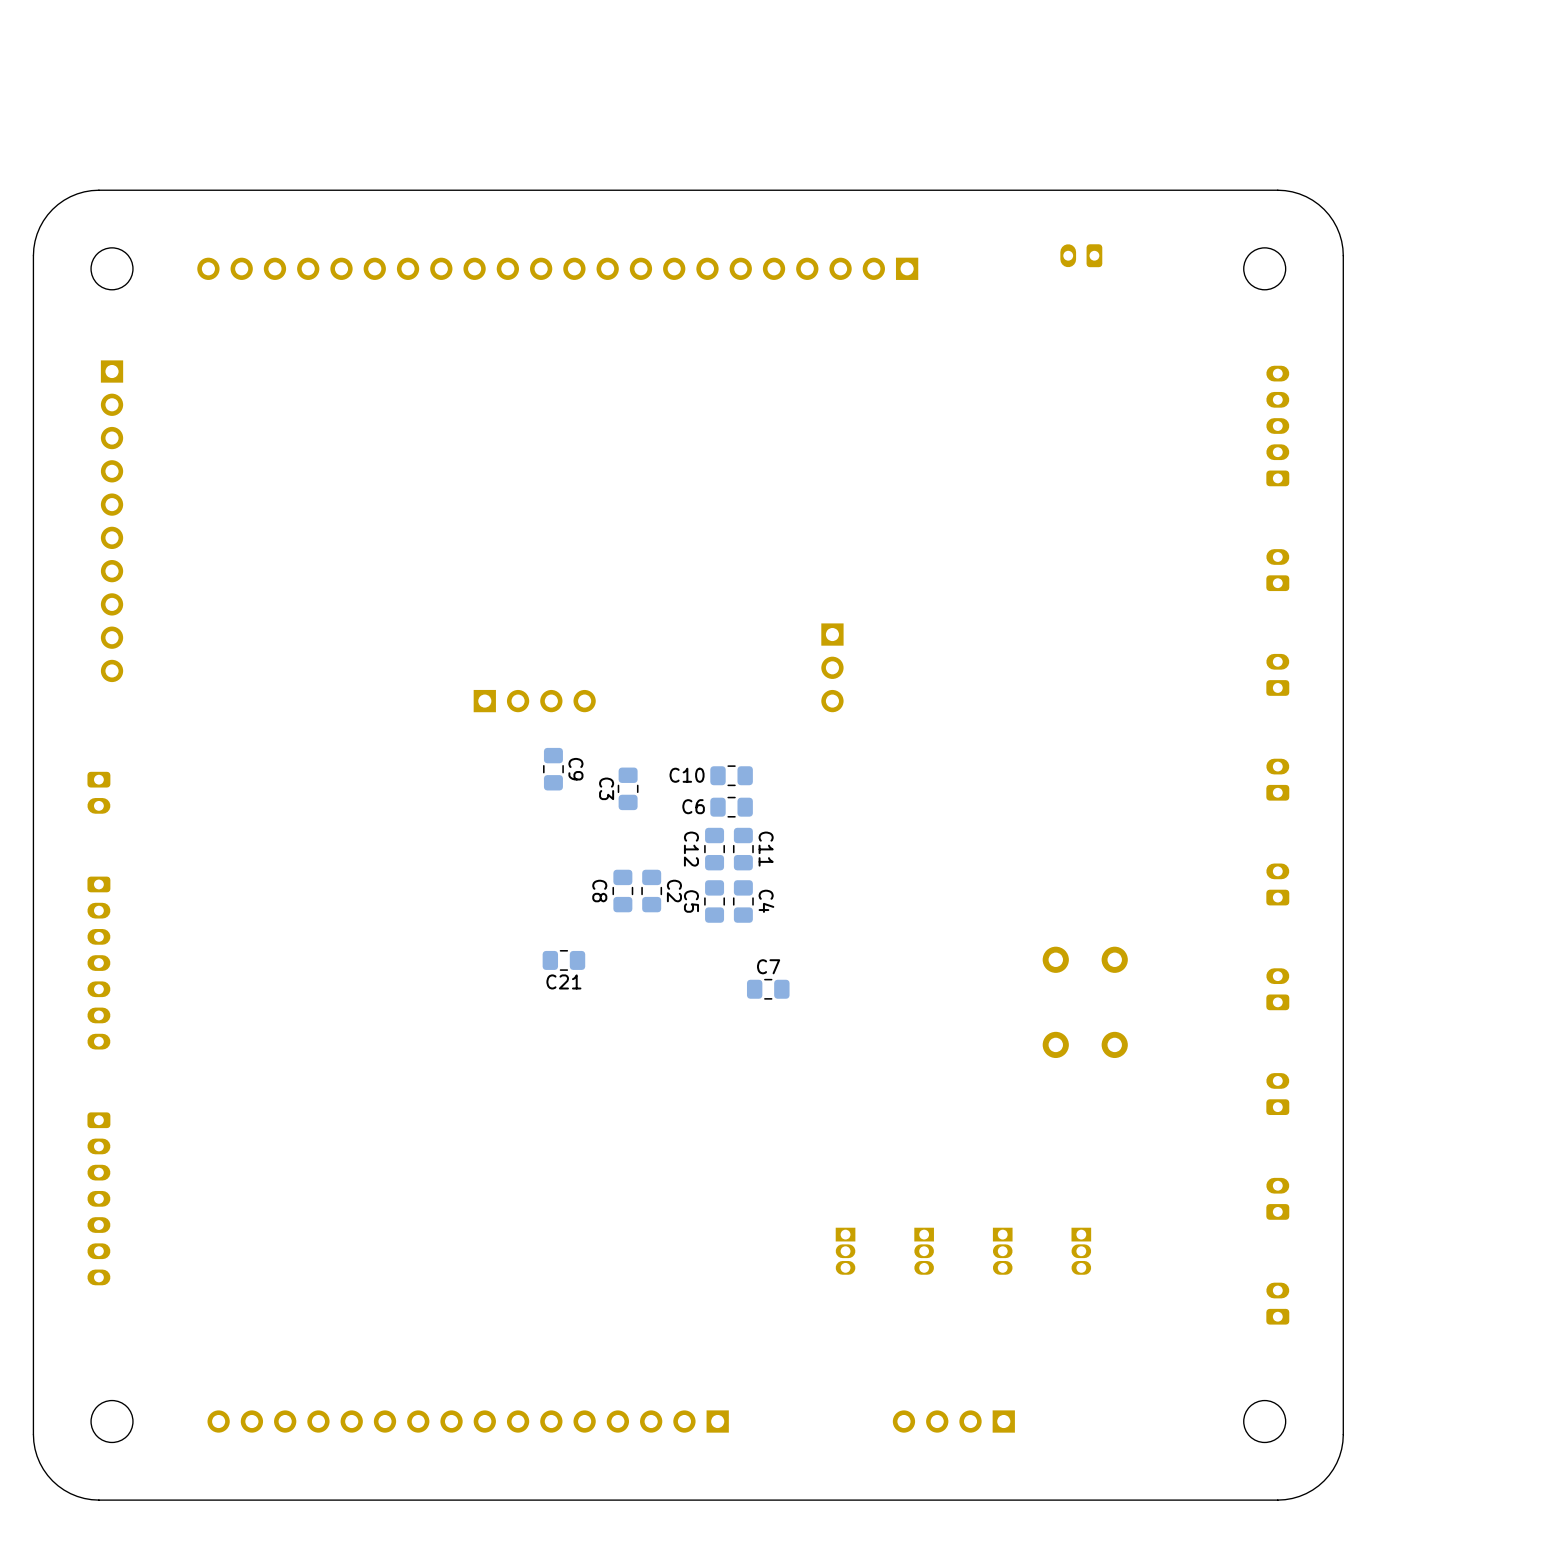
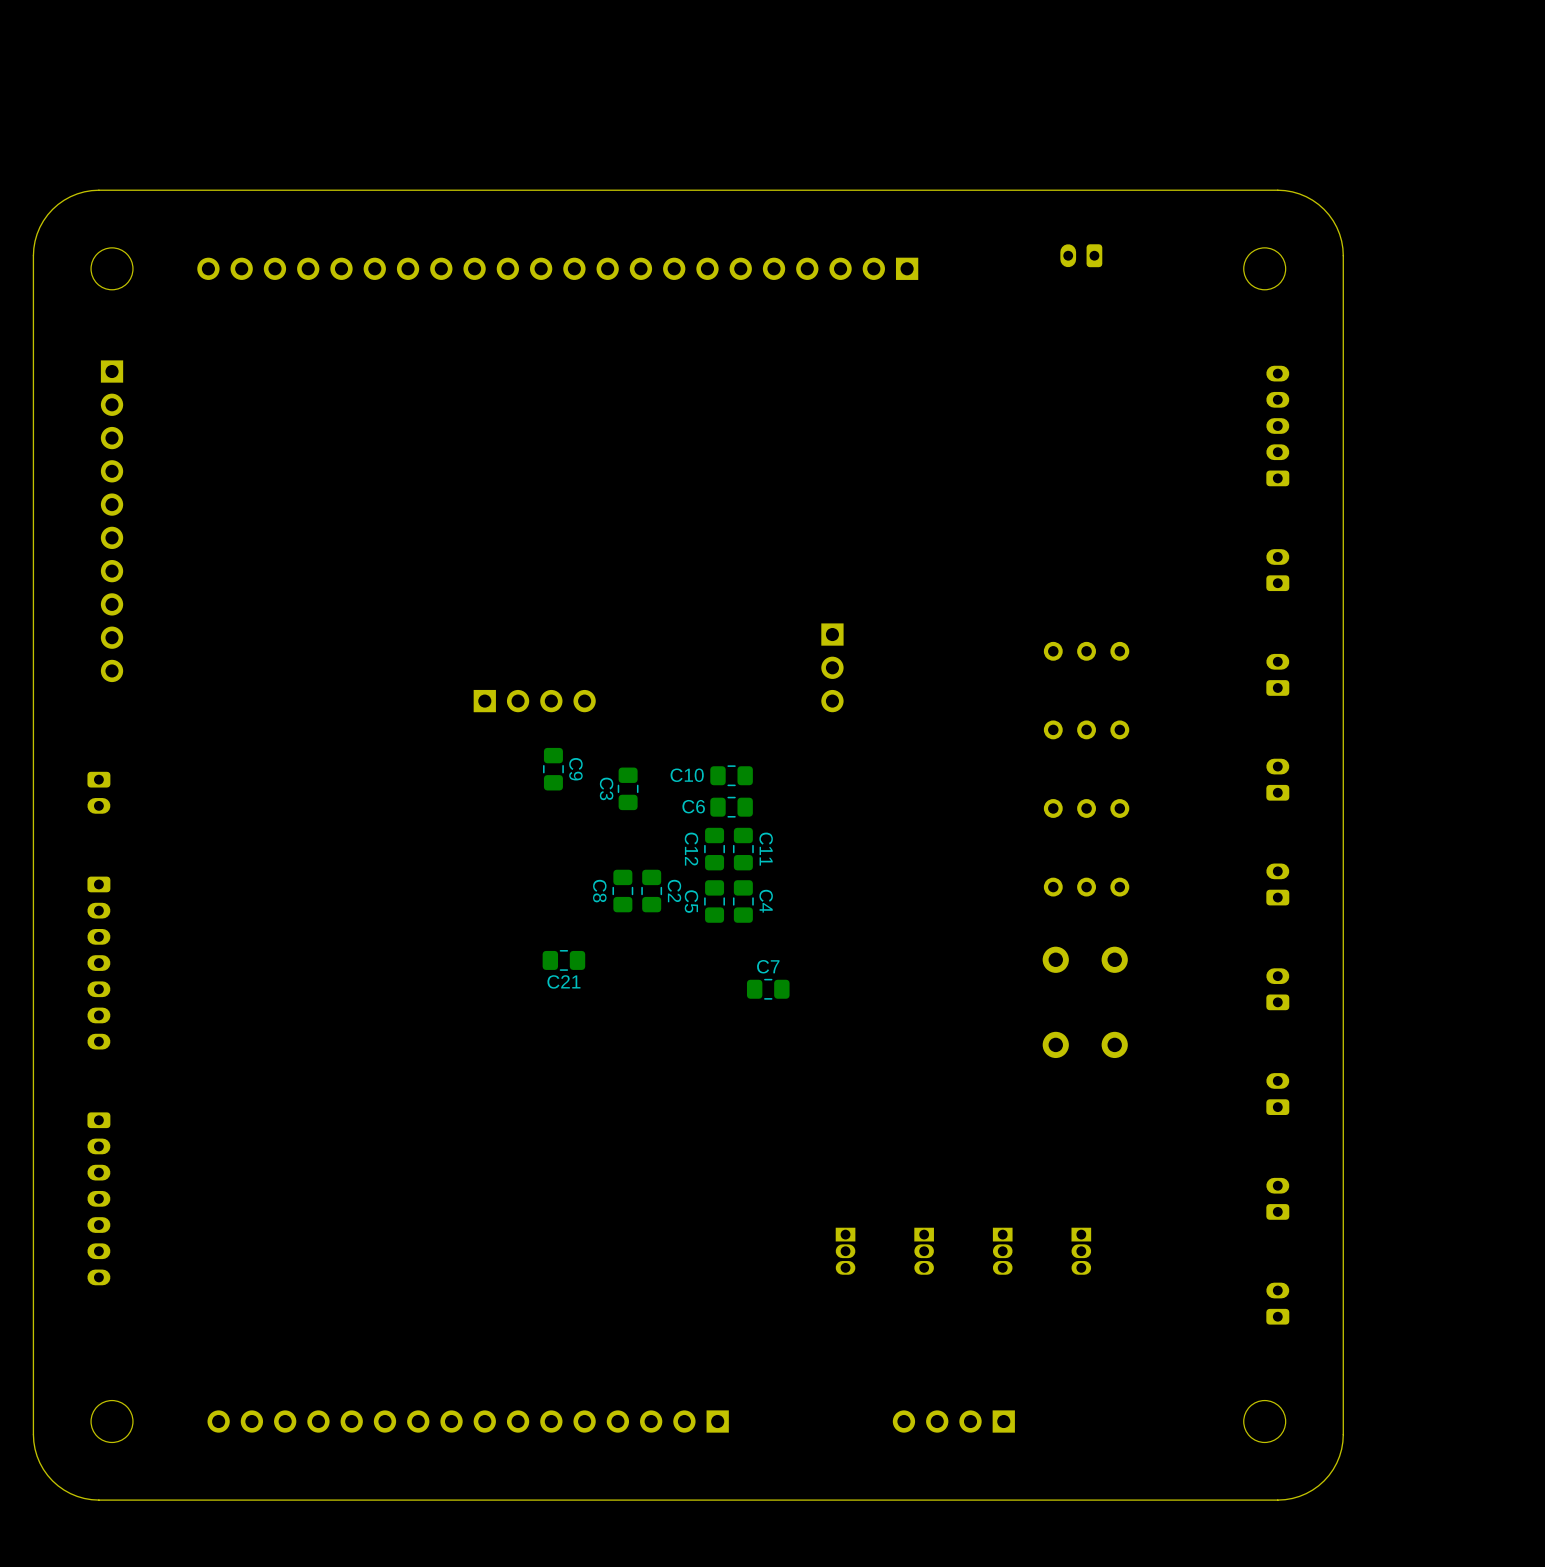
part: none -> (1086, 651)
part: none -> (1086, 729)
part: none -> (1086, 808)
part: none -> (1086, 887)

